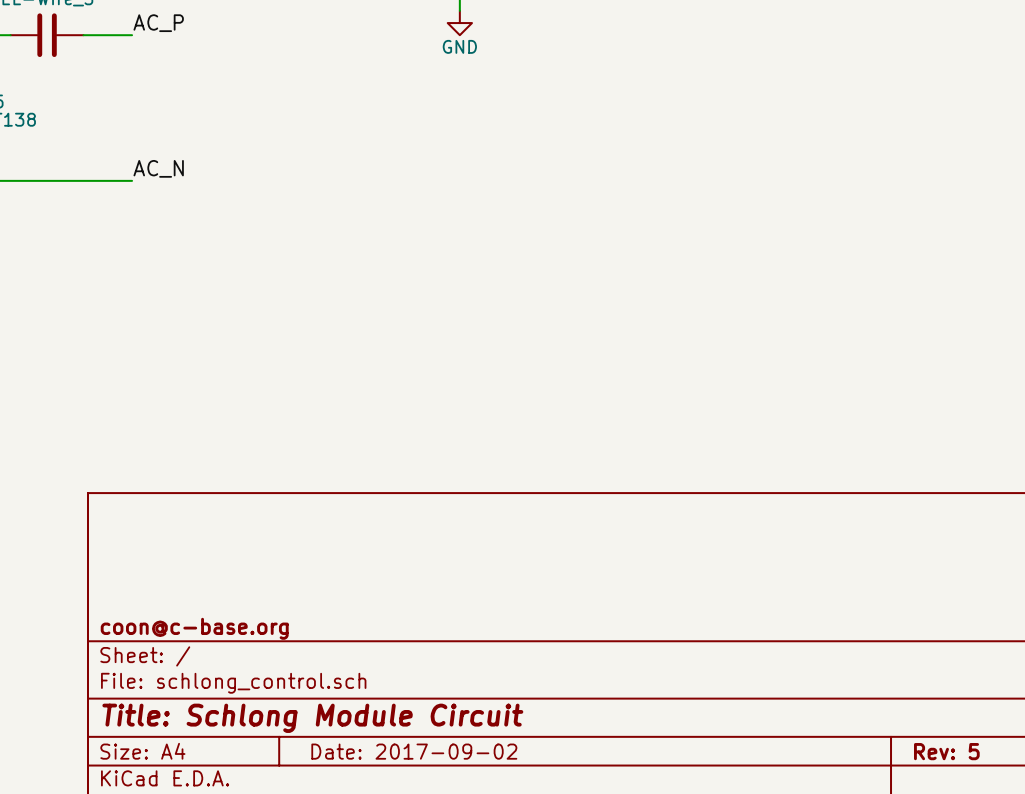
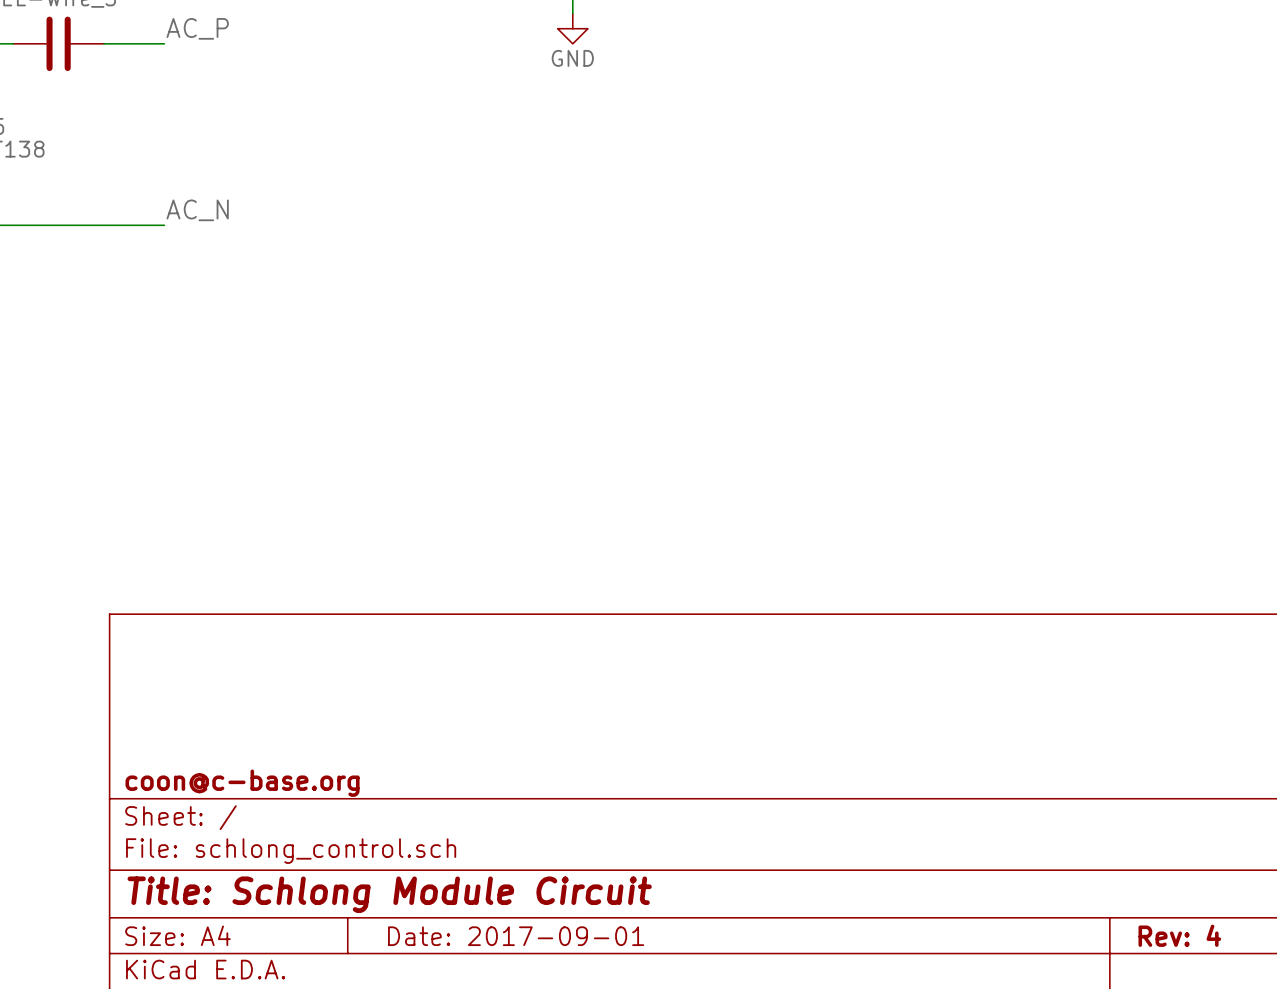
title block: Date: 2017-09-02 (414, 751) -> Date: 2017-09-01 (516, 936)
title block: Rev: 5 (946, 751) -> Rev: 4 (1179, 935)

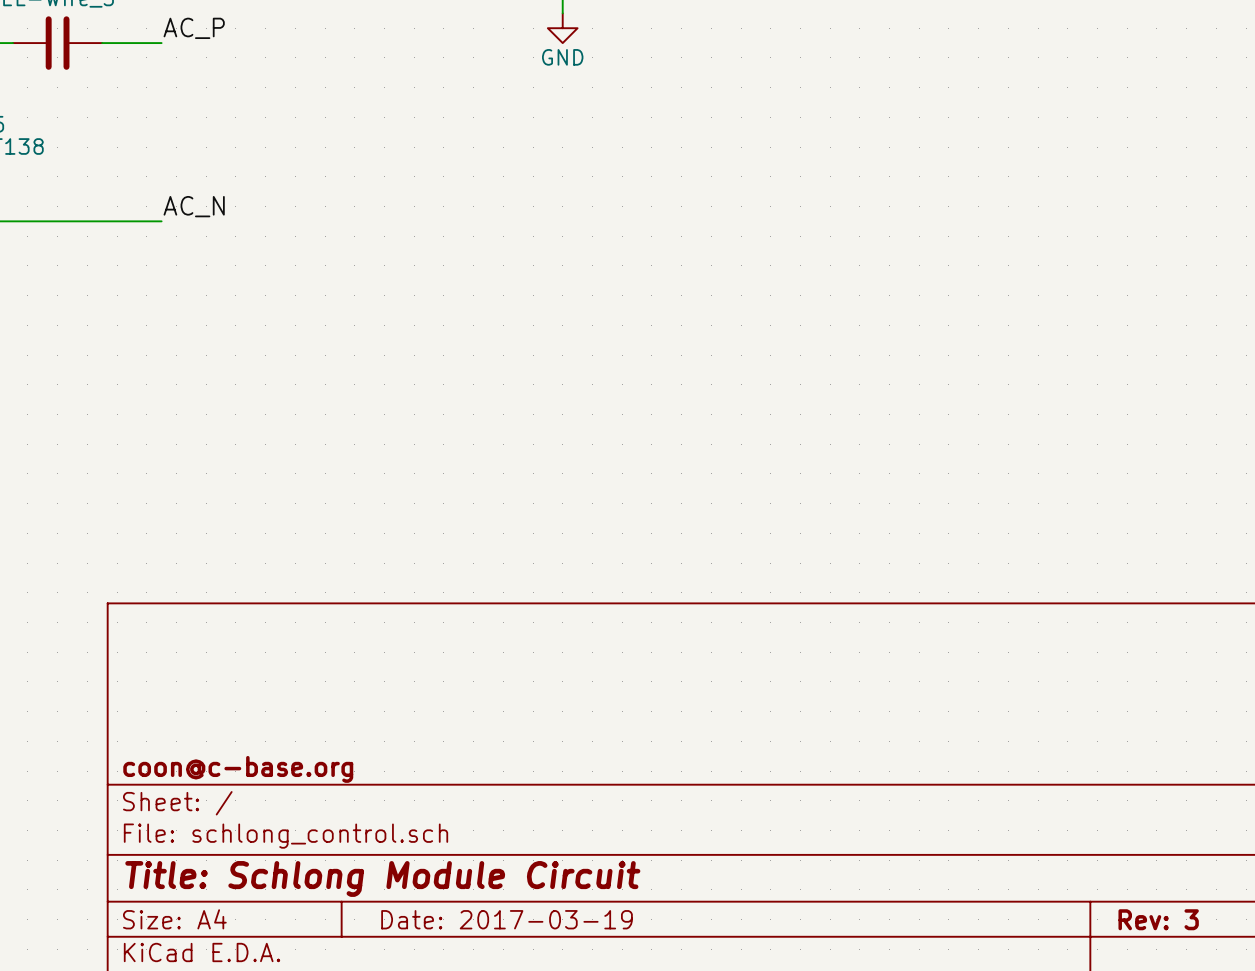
title block: Rev: 4 (1179, 935) -> Rev: 3 (1158, 919)
title block: Date: 2017-09-01 (516, 936) -> Date: 2017-03-19 (507, 919)

